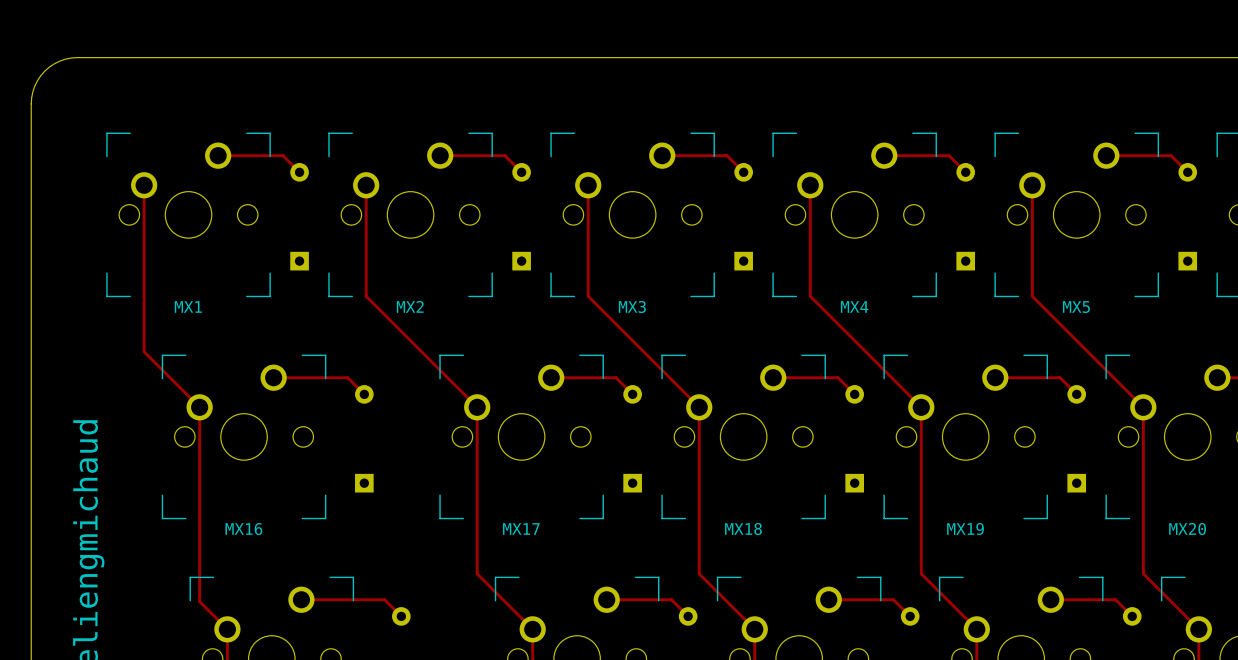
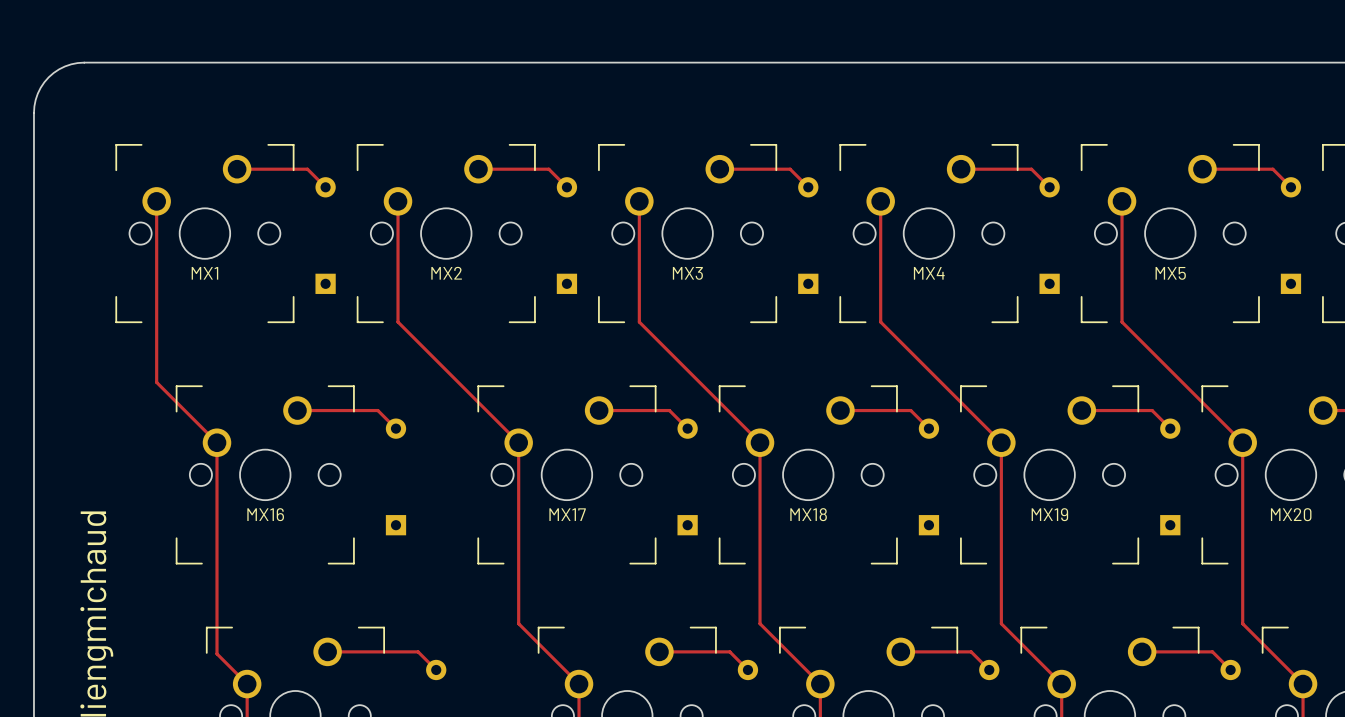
MX1 name position: MX1 (188, 306) -> MX1 (204, 273)
MX2 name position: MX2 (410, 306) -> MX2 (446, 273)
MX3 name position: MX3 (632, 306) -> MX3 (687, 273)
MX4 name position: MX4 (854, 306) -> MX4 (929, 273)
MX5 name position: MX5 (1076, 307) -> MX5 (1170, 273)
MX16 name position: MX16 (243, 529) -> MX16 (265, 514)
MX17 name position: MX17 (521, 529) -> MX17 (567, 514)
MX18 name position: MX18 (743, 529) -> MX18 (808, 514)
MX19 name position: MX19 (965, 529) -> MX19 (1049, 514)
MX20 name position: MX20 (1187, 529) -> MX20 (1291, 514)

